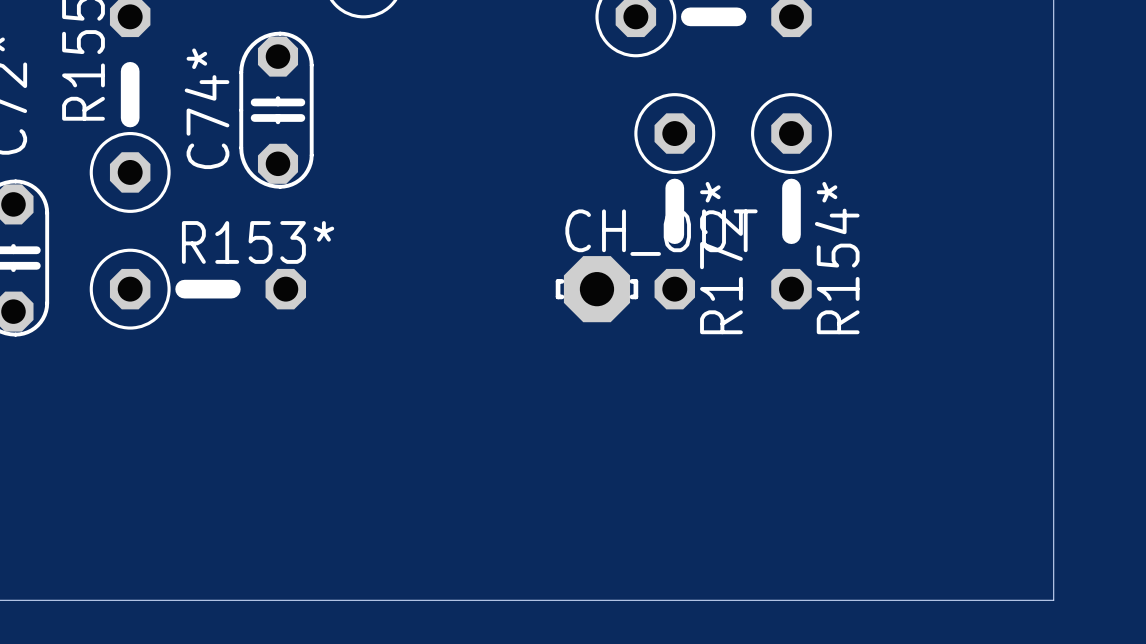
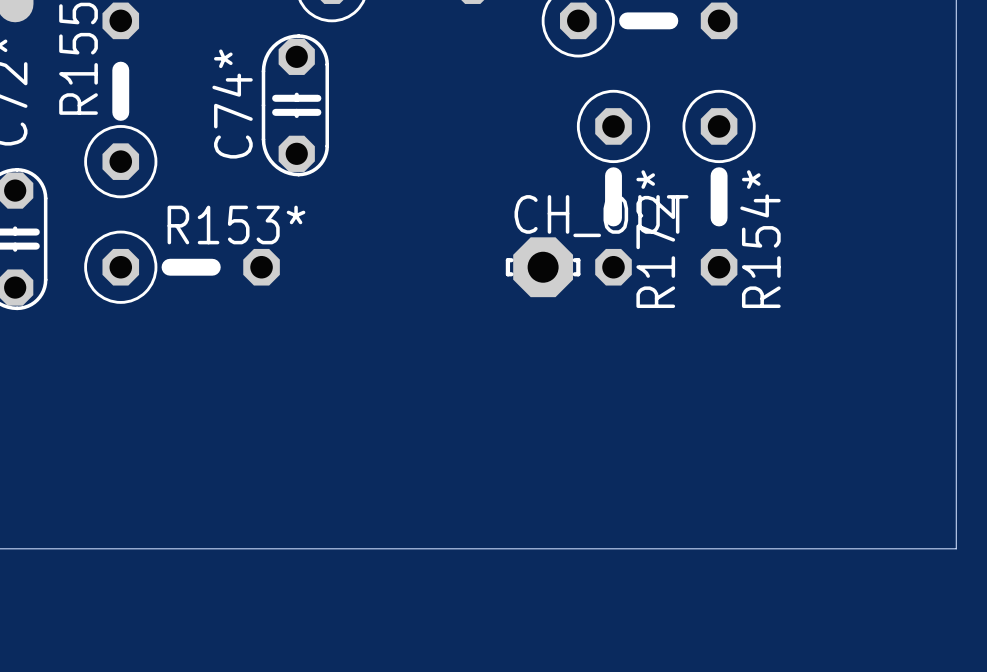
C74* position: (276, 110) -> (295, 105)

